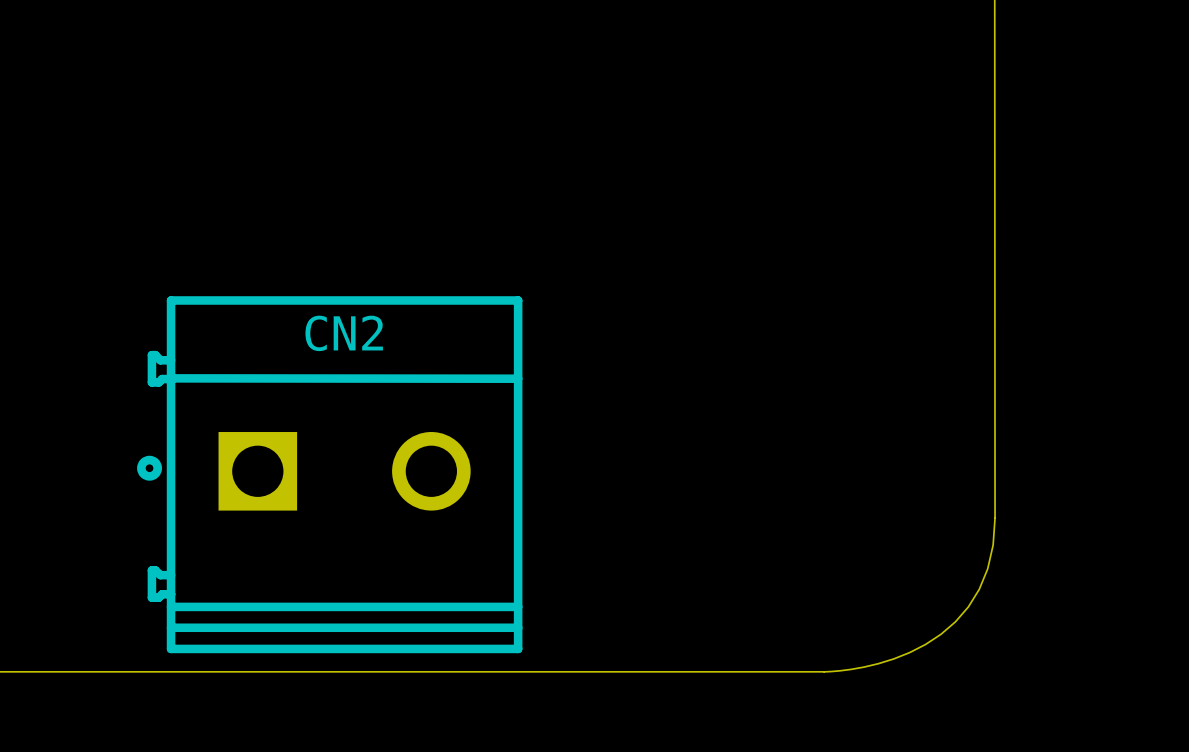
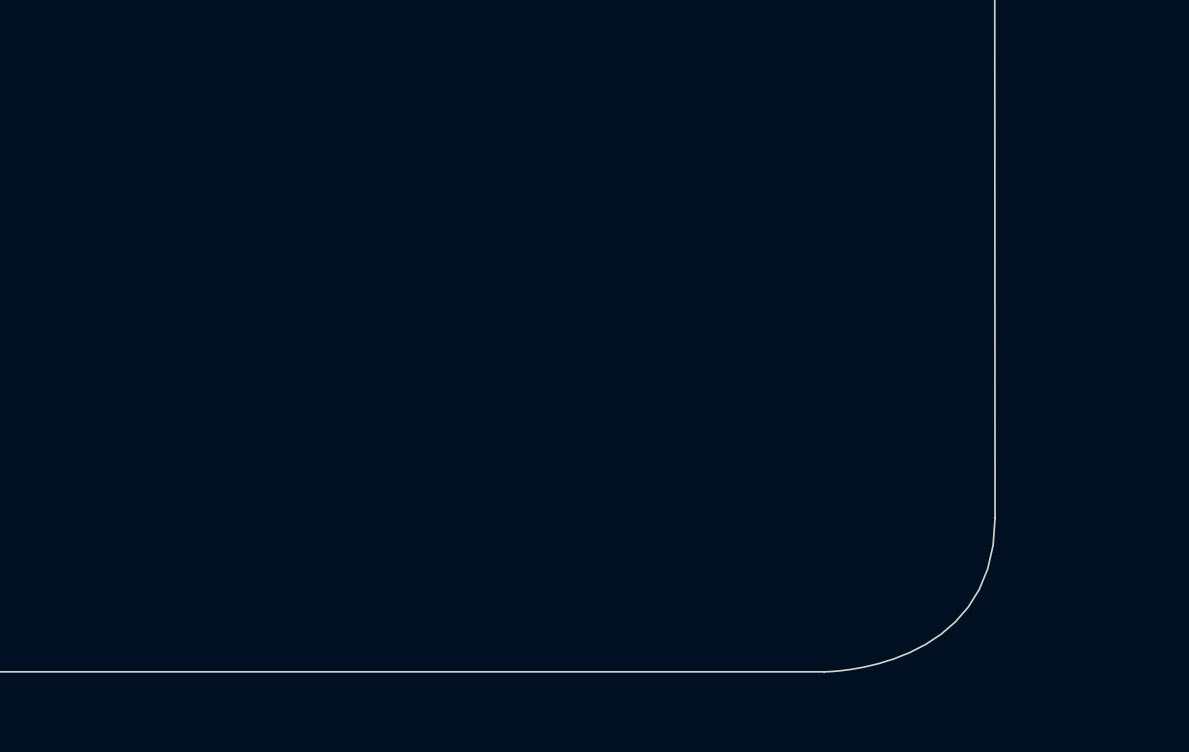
CN2: (329, 474) -> none

